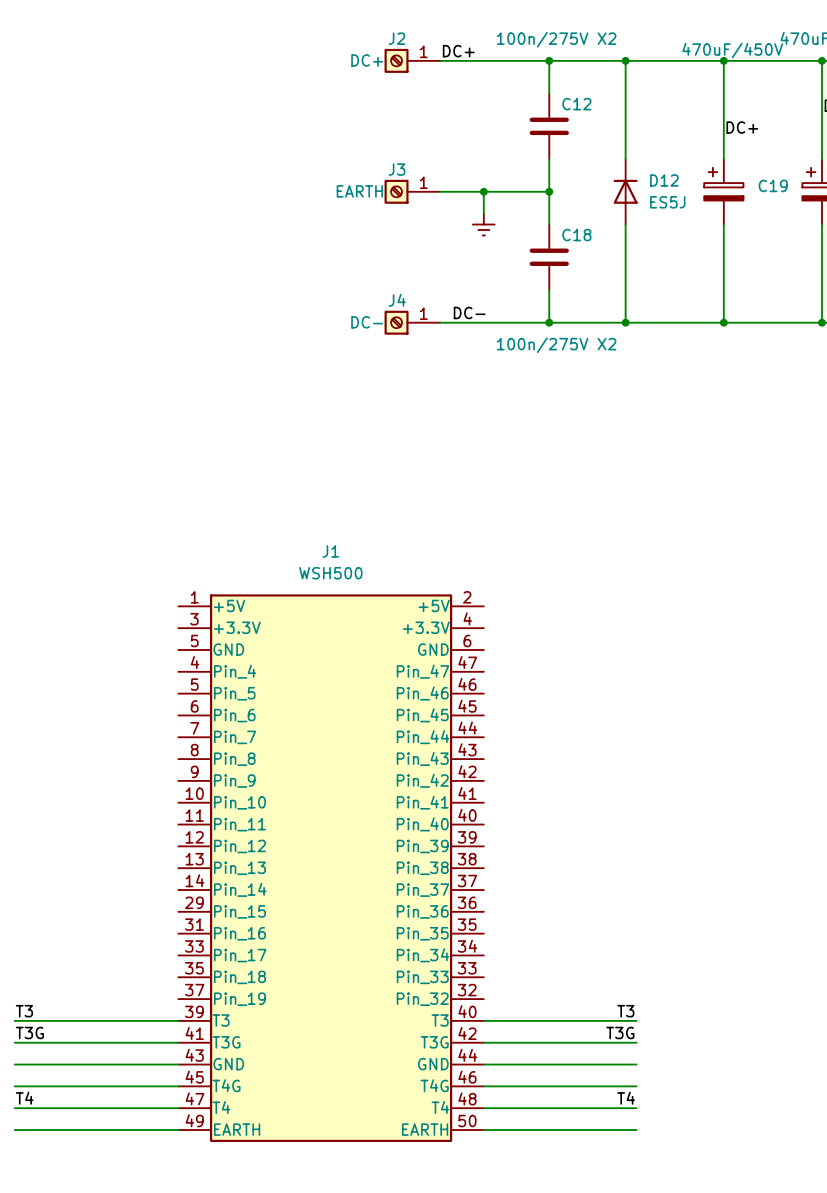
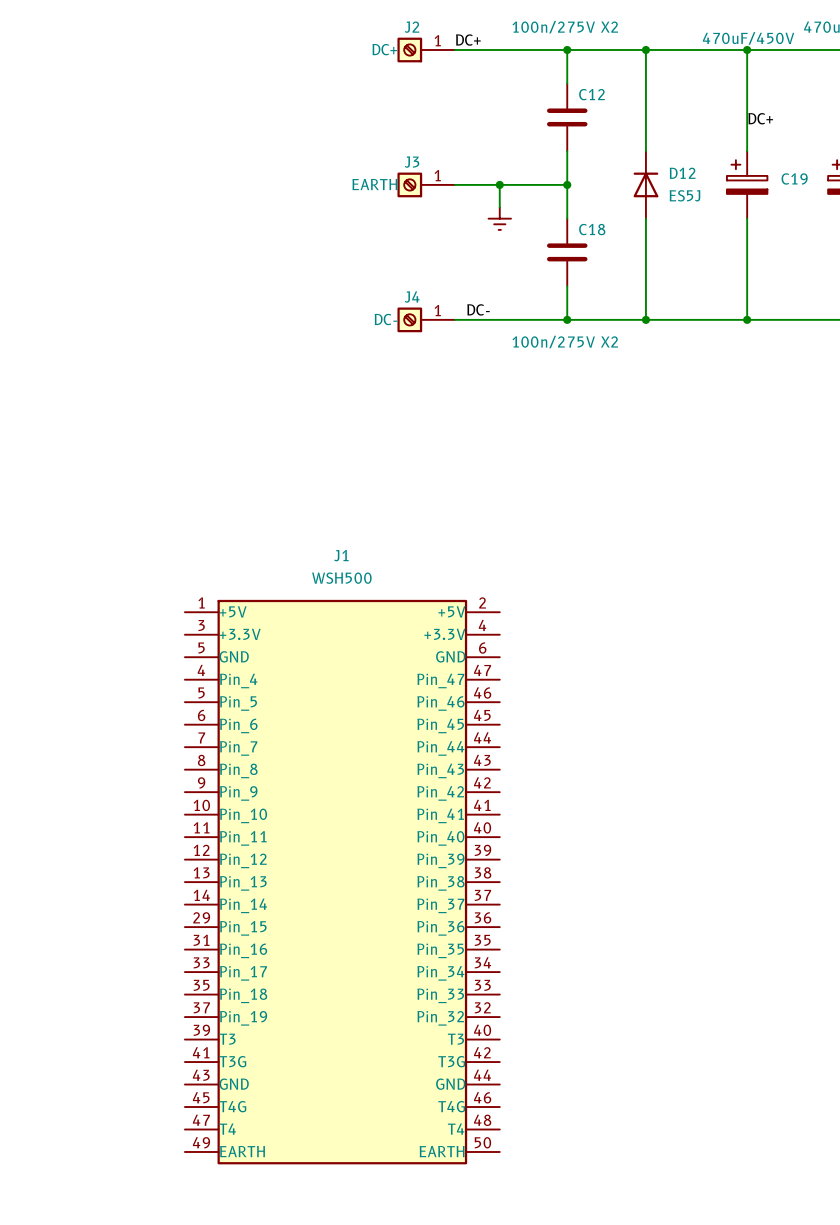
label: T3 (24, 1011) -> none
label: T3 (625, 1011) -> none
wire: (14, 1020) (178, 1020) -> none
wire: (483, 1020) (636, 1020) -> none
label: T3G (29, 1033) -> none
label: T3G (620, 1033) -> none
wire: (14, 1042) (178, 1042) -> none
wire: (483, 1042) (636, 1042) -> none
wire: (14, 1064) (178, 1064) -> none
wire: (483, 1064) (636, 1064) -> none
wire: (14, 1086) (178, 1086) -> none
wire: (483, 1086) (636, 1086) -> none
label: T4 (24, 1098) -> none
label: T4 (626, 1098) -> none
wire: (14, 1108) (178, 1108) -> none
wire: (483, 1108) (636, 1108) -> none
wire: (14, 1130) (178, 1130) -> none
wire: (483, 1130) (636, 1130) -> none

